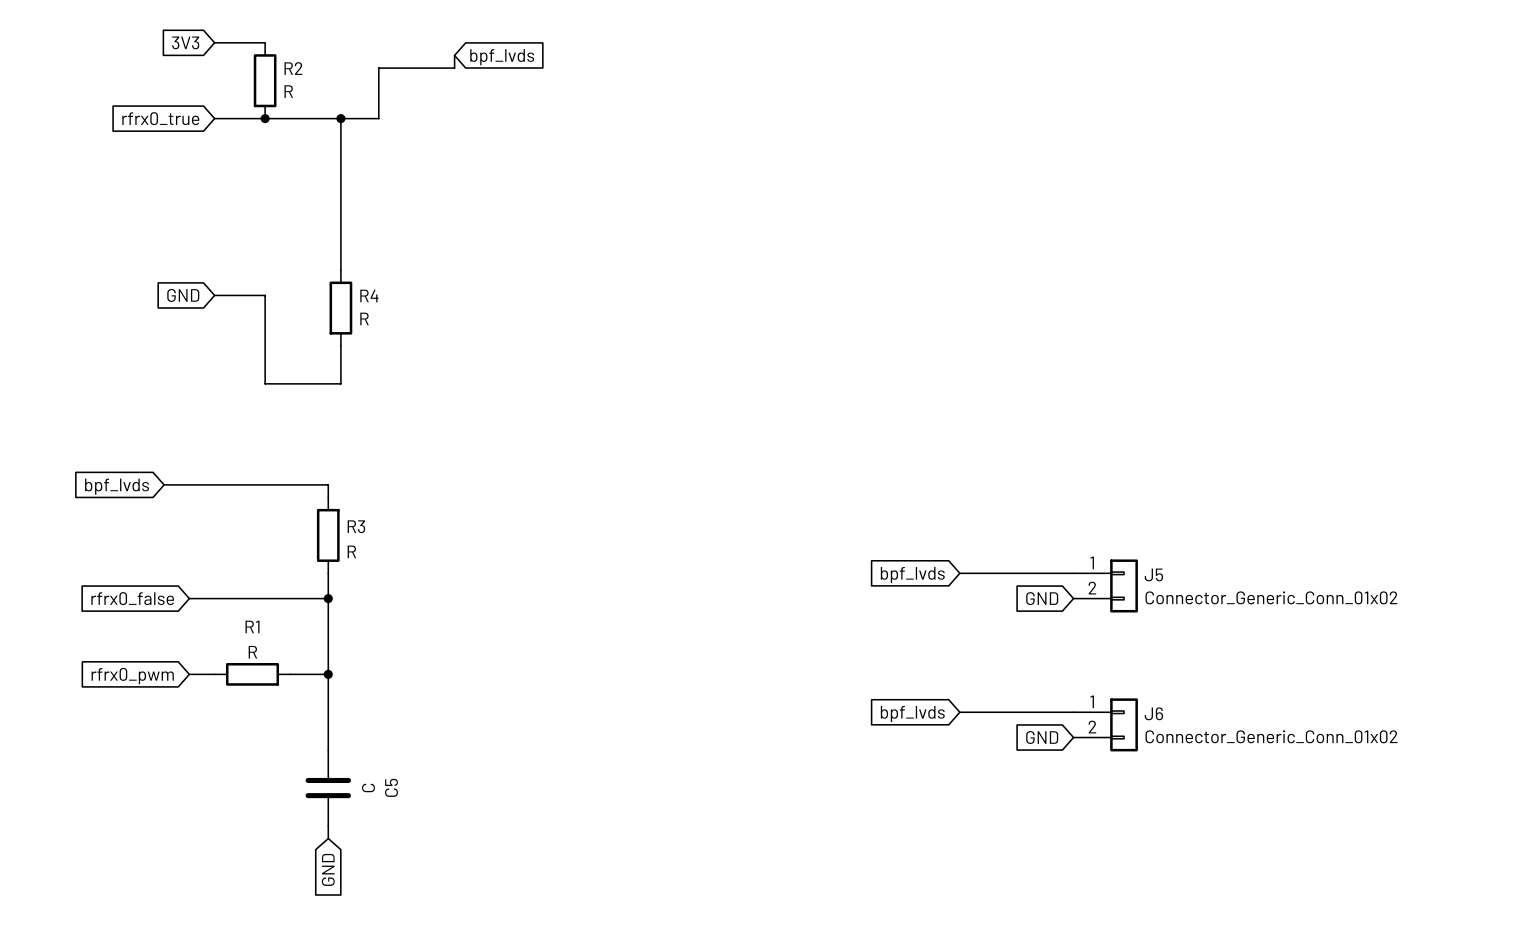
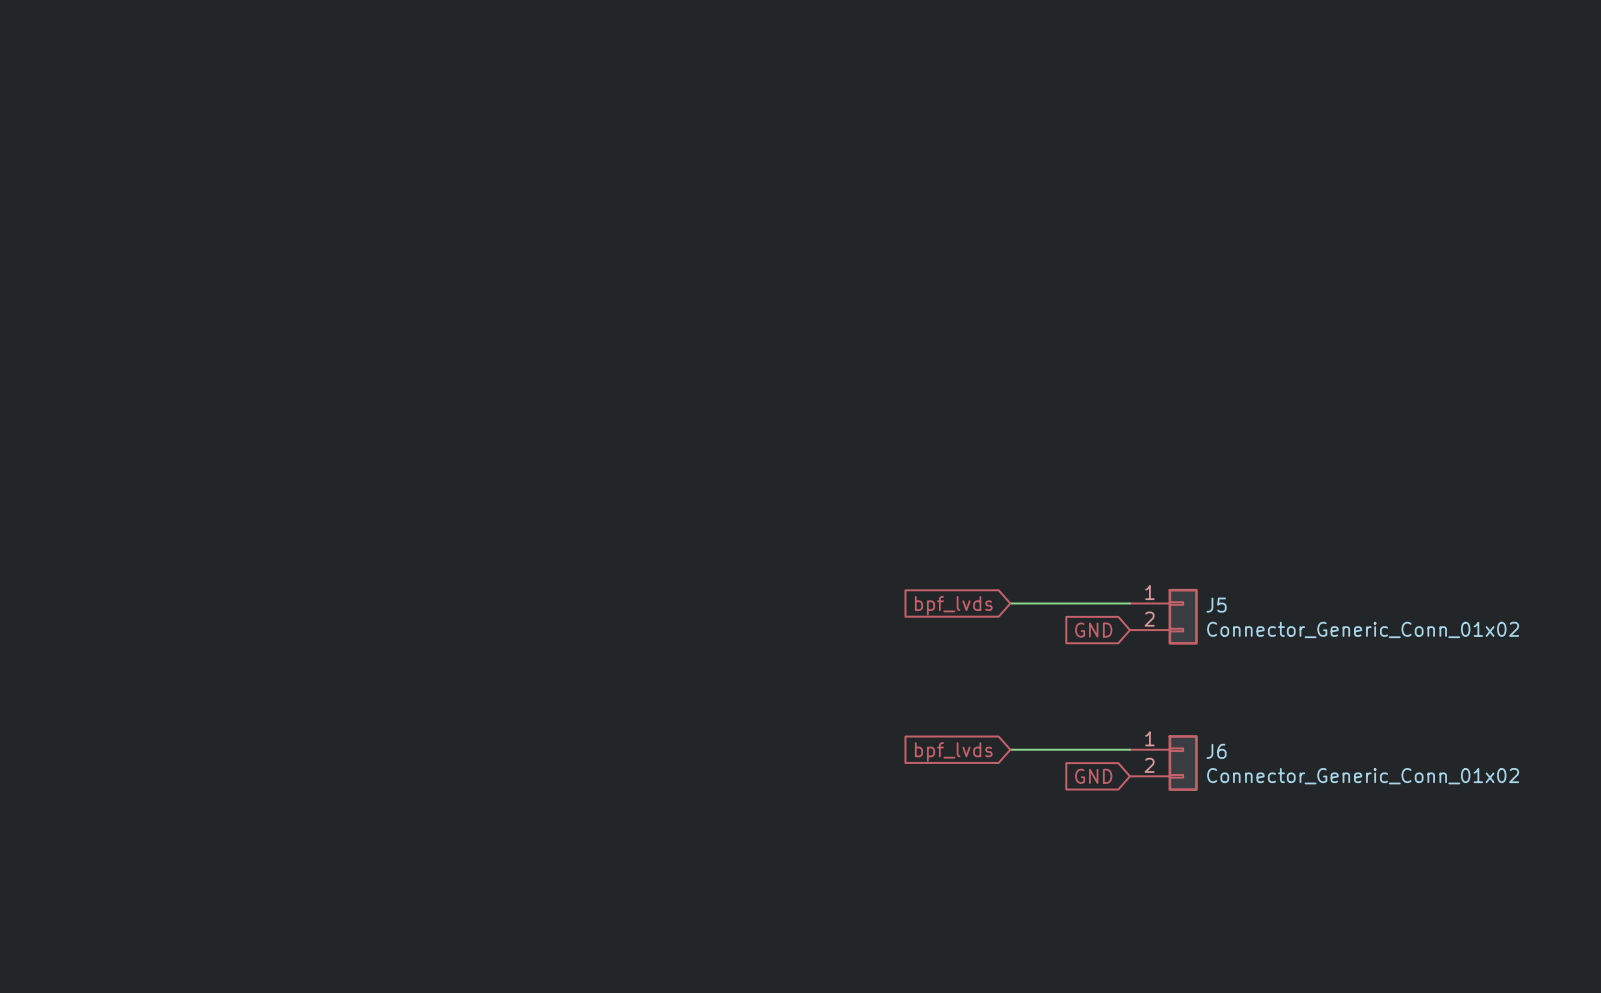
global label: 3V3 (185, 42) -> none
wire: (214, 42) (265, 42) -> none
wire: (454, 55) (454, 68) (378, 68) (378, 118) (214, 118) -> none
global label: bpf_lvds (502, 57) -> none
R2: R (265, 80) -> none
global label: rfrx0_true (160, 118) -> none
junction: (265, 118) -> none
wire: (340, 118) (340, 270) -> none
junction: (340, 118) -> none
global label: GND (183, 295) -> none
wire: (214, 295) (265, 295) (265, 383) (340, 383) (340, 345) -> none
R4: R (340, 308) -> none
wire: (164, 484) (328, 484) (328, 497) -> none
global label: bpf_lvds (117, 486) -> none
R3: R (328, 535) -> none
wire: (328, 573) (328, 750) -> none
global label: rfrx0_false (132, 598) -> none
wire: (189, 598) (328, 598) -> none
junction: (328, 598) -> none
wire: (189, 674) (214, 674) -> none
R1: R (252, 674) -> none
wire: (290, 674) (328, 674) -> none
junction: (328, 674) -> none
global label: rfrx0_pwm (132, 676) -> none
C5: C (328, 788) -> none
wire: (328, 825) (328, 838) -> none
global label: GND (328, 869) -> none

